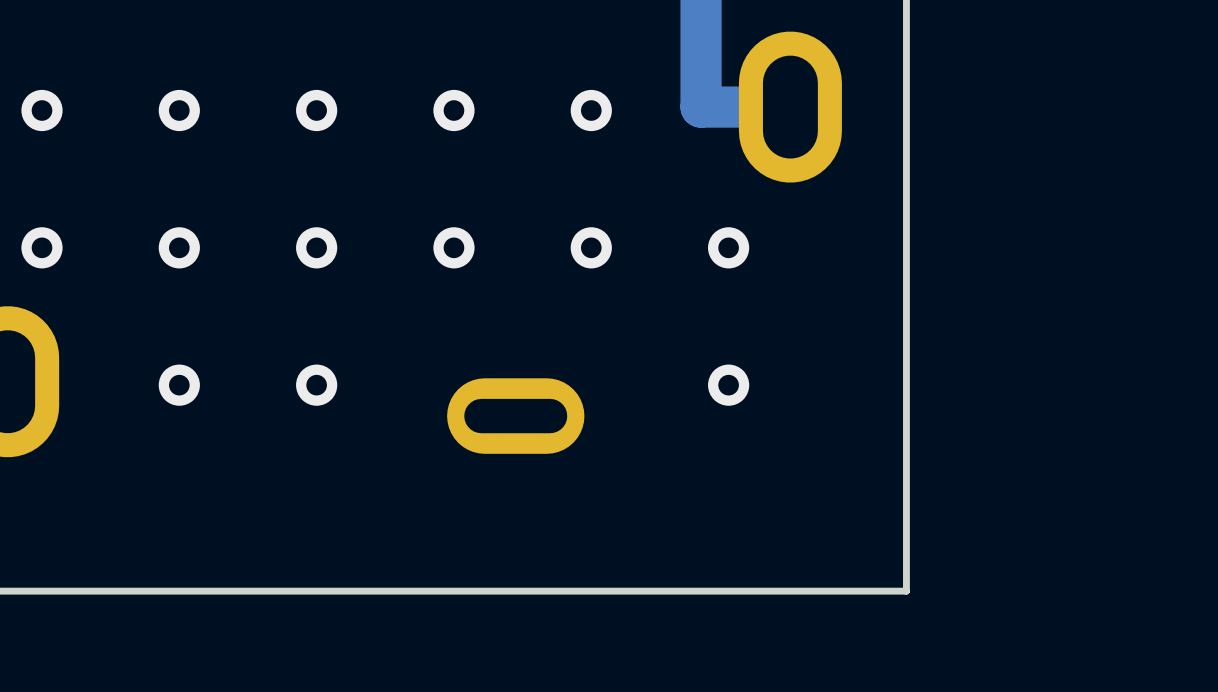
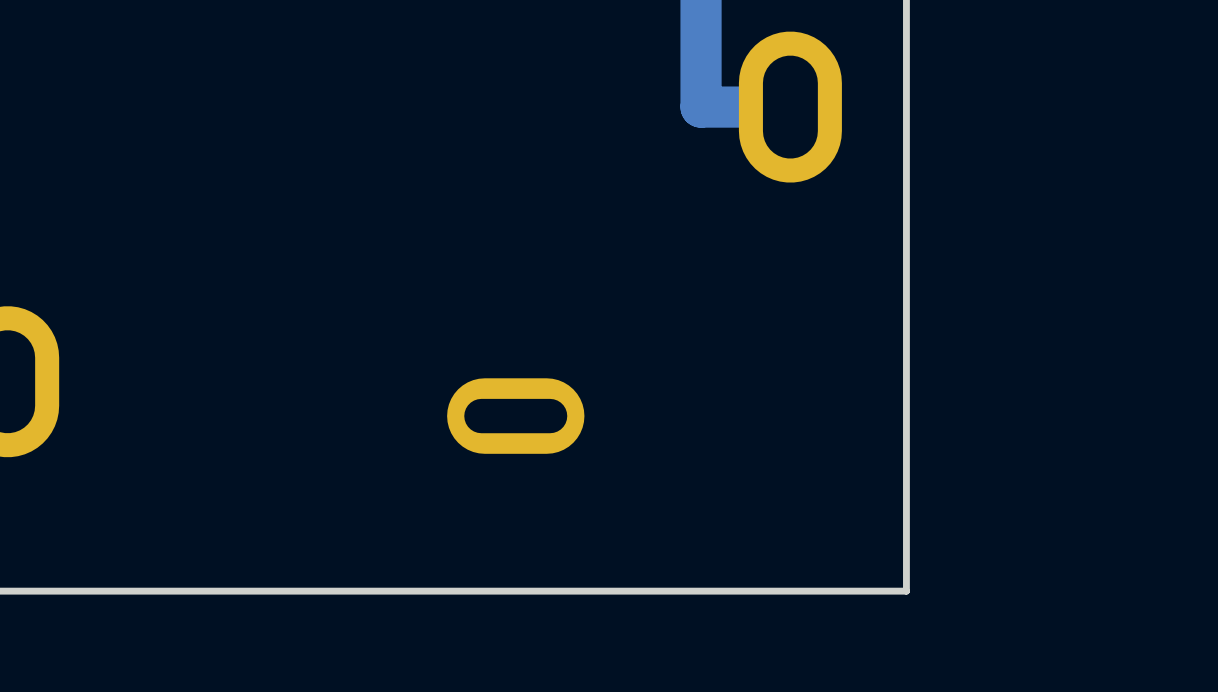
via: (42, 110) -> none
via: (179, 110) -> none
via: (316, 110) -> none
via: (453, 110) -> none
via: (591, 110) -> none
via: (42, 247) -> none
via: (179, 247) -> none
via: (316, 247) -> none
via: (453, 247) -> none
via: (591, 247) -> none
via: (728, 247) -> none
via: (179, 385) -> none
via: (316, 385) -> none
via: (728, 385) -> none

